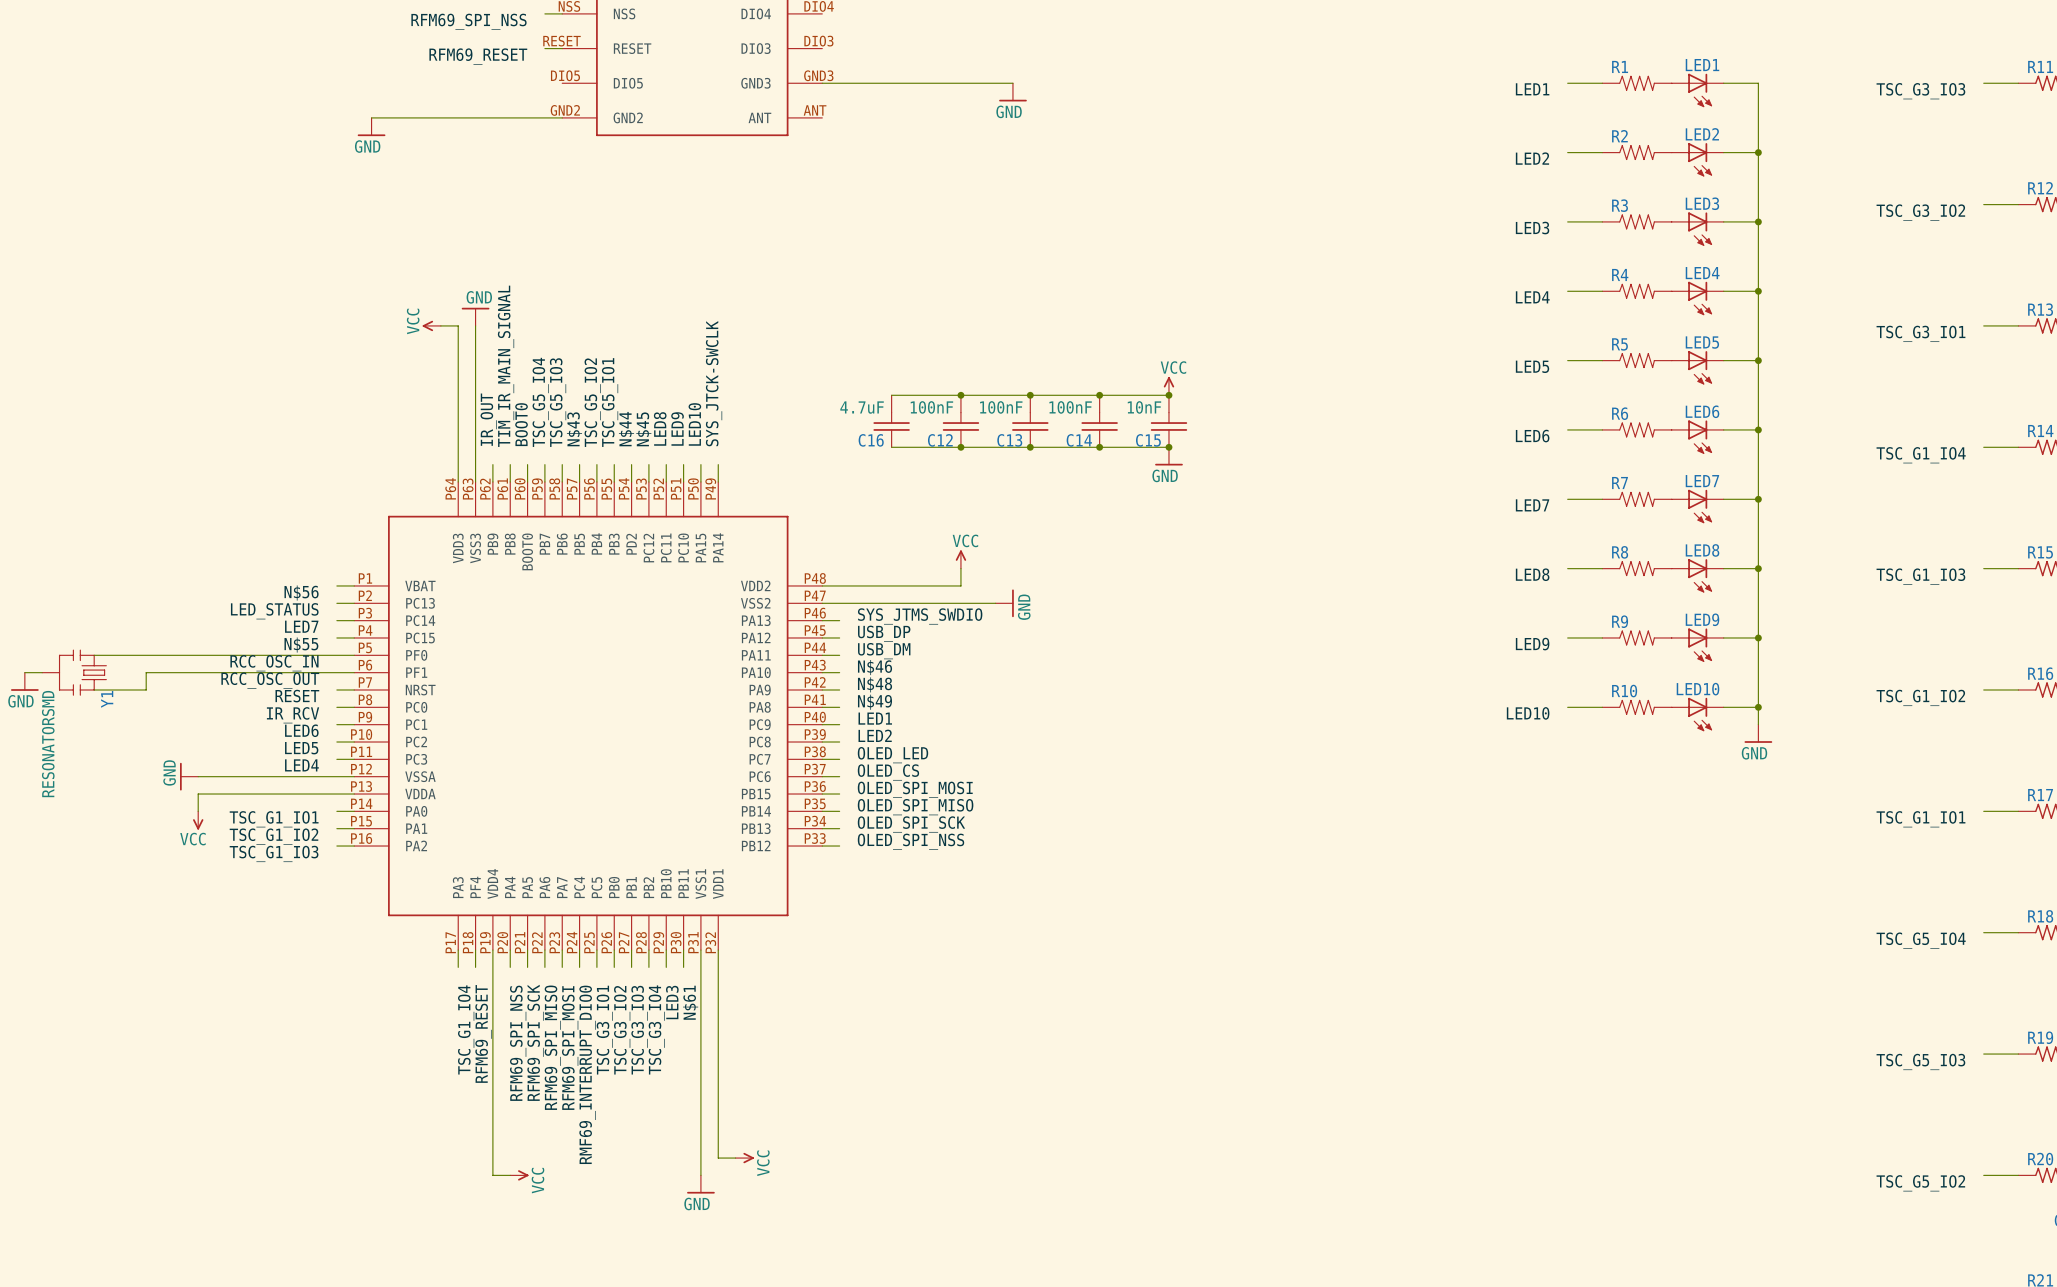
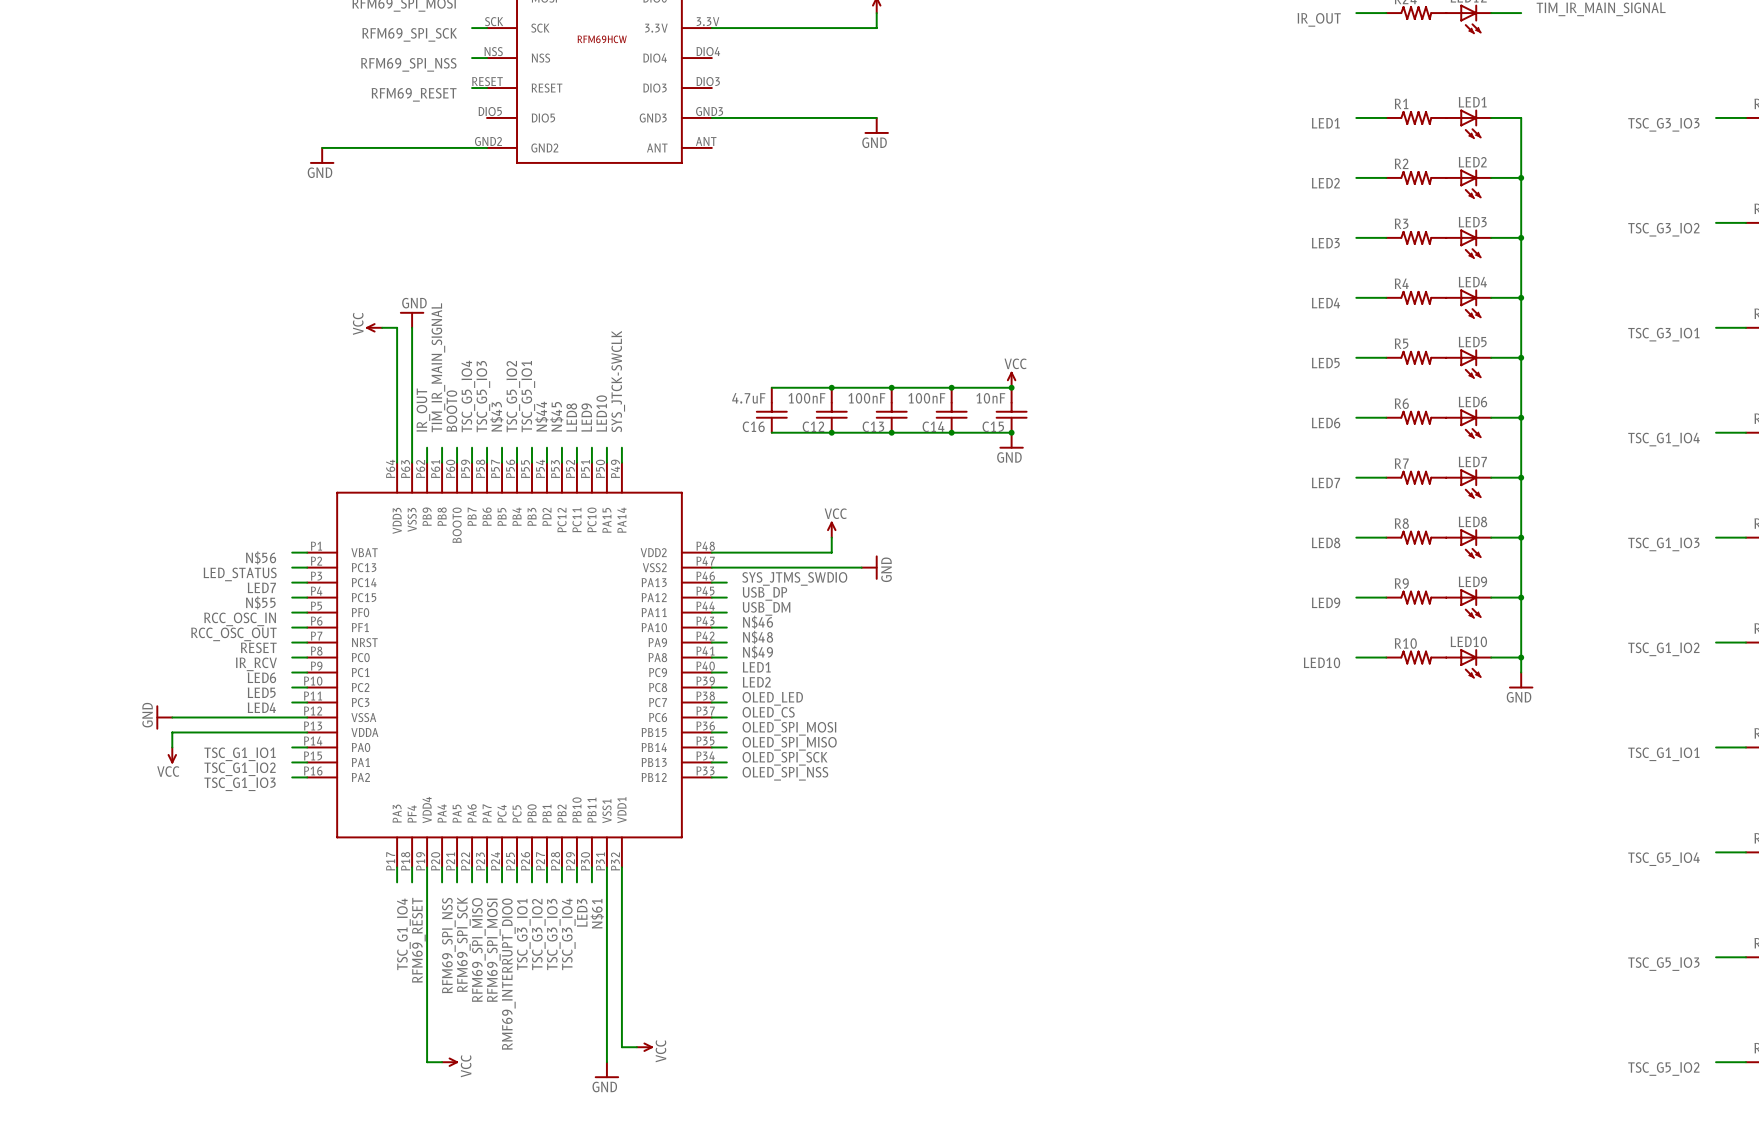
wire: (94, 655) (336, 655) -> none
wire: (24, 672) (42, 672) -> none
Y1: RESONATORSMD (74, 672) -> none
wire: (336, 672) (146, 672) (146, 689) (94, 689) -> none
power symbol: GND (24, 681) -> none

